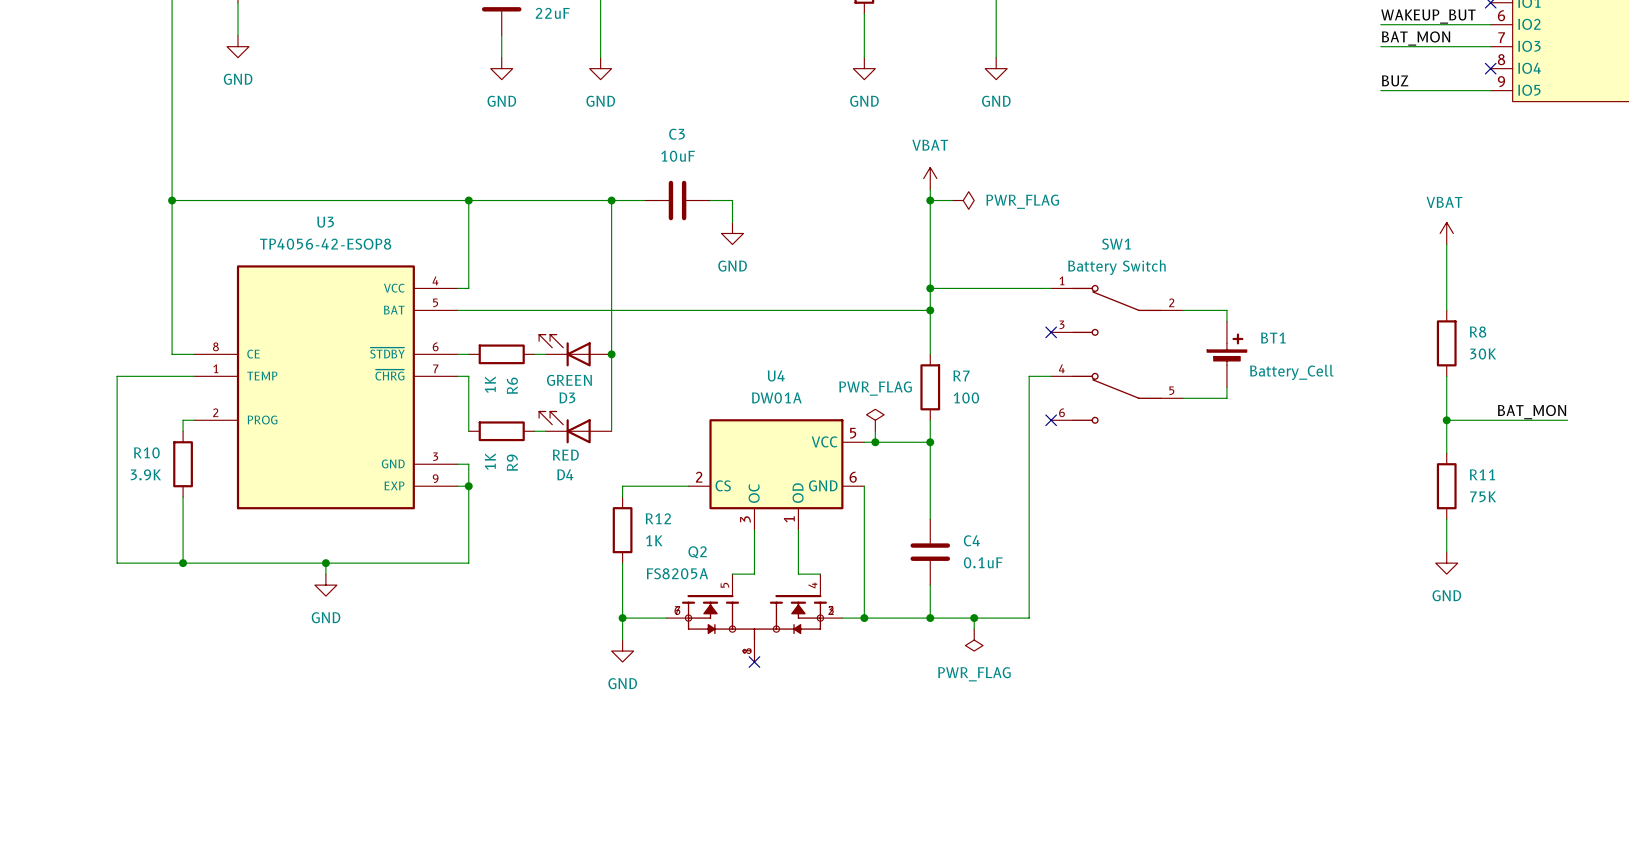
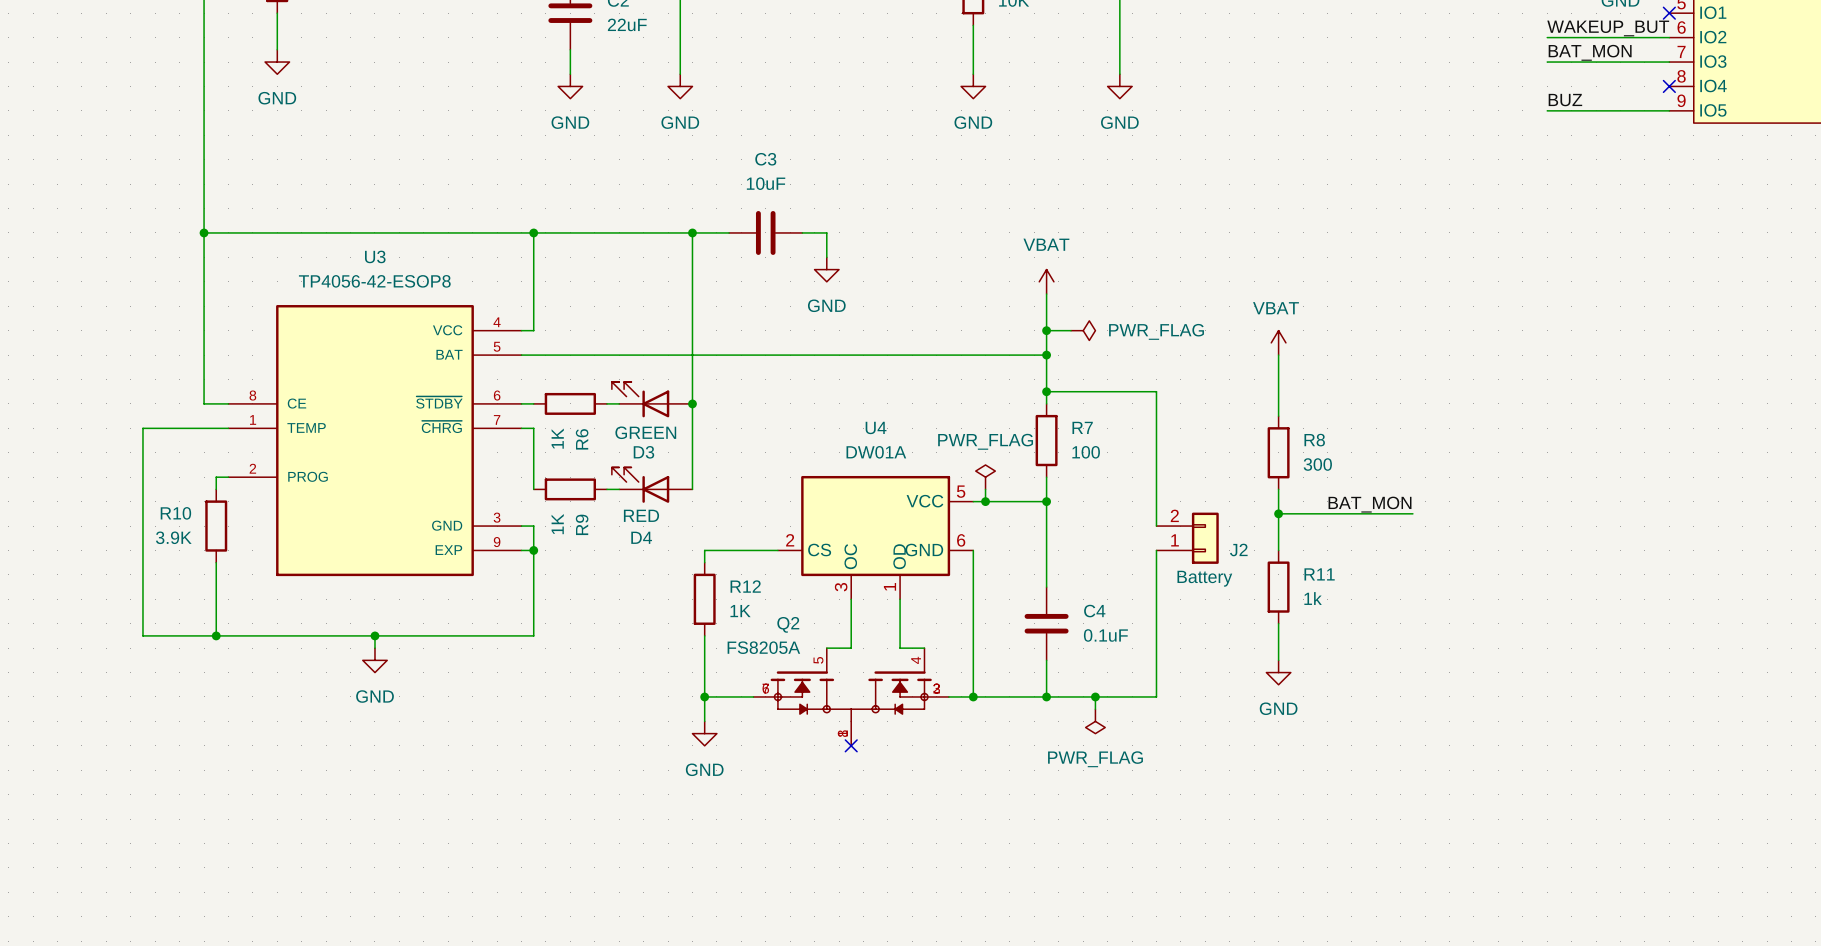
power symbol position: VBAT (930, 178) -> VBAT (1046, 281)
wire: (930, 189) (930, 255) -> none
wire: (930, 200) (952, 200) -> none
junction: (930, 200) -> none
power symbol position: PWR_FLAG (963, 200) -> PWR_FLAG (1083, 330)
power symbol: VBAT (1446, 233) -> none
wire: (1446, 244) (1446, 310) -> none
wire: (952, 288) (1051, 288) -> none
power symbol: none -> VBAT (1278, 342)
wire: none -> (1278, 355) (1278, 416)
wire: (1183, 310) (1226, 310) (1226, 321) -> none
no-connect mark: (1051, 332) -> none
junction: none -> (1046, 391)
R8 position: (1446, 343) -> (1278, 452)
SW1: Battery Switch (1117, 354) -> none
BT1: Battery_Cell (1226, 354) -> none
R8 value: 30K (1483, 354) -> 300 (1317, 464)
wire: (1029, 376) (1051, 376) -> (1156, 428) (1156, 391) (1046, 391)
wire: (1446, 376) (1446, 453) -> none
wire: (1226, 387) (1226, 398) (1183, 398) -> none
label: BAT_MON (1532, 412) -> none
no-connect mark: (1051, 420) -> none
wire: (1446, 420) (1567, 420) -> none
junction: (1446, 420) -> none
wire: none -> (1278, 489) (1278, 550)
label: none -> BAT_MON (1370, 504)
wire: none -> (1278, 513) (1412, 513)
junction: none -> (1278, 513)
wire: (1029, 464) (1029, 486) -> none
J2: none -> Battery (1187, 538)
R11 position: (1446, 486) -> (1278, 587)
R11 value: 75K (1483, 496) -> 1k (1313, 598)
wire: (1446, 519) (1446, 552) -> none
wire: none -> (1278, 623) (1278, 660)
power symbol: GND (1446, 563) -> none
power symbol: none -> GND (1278, 672)

